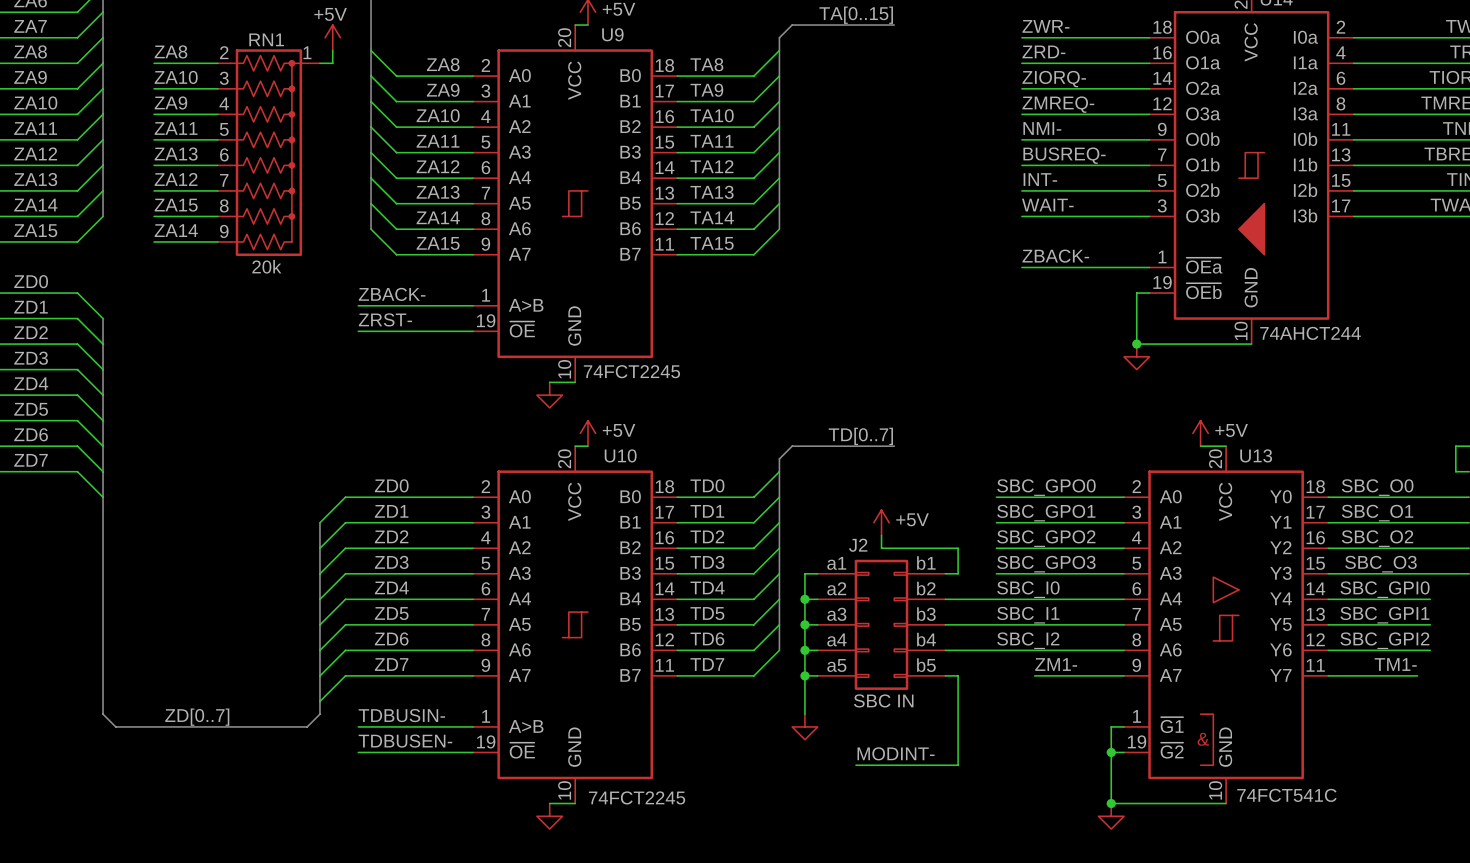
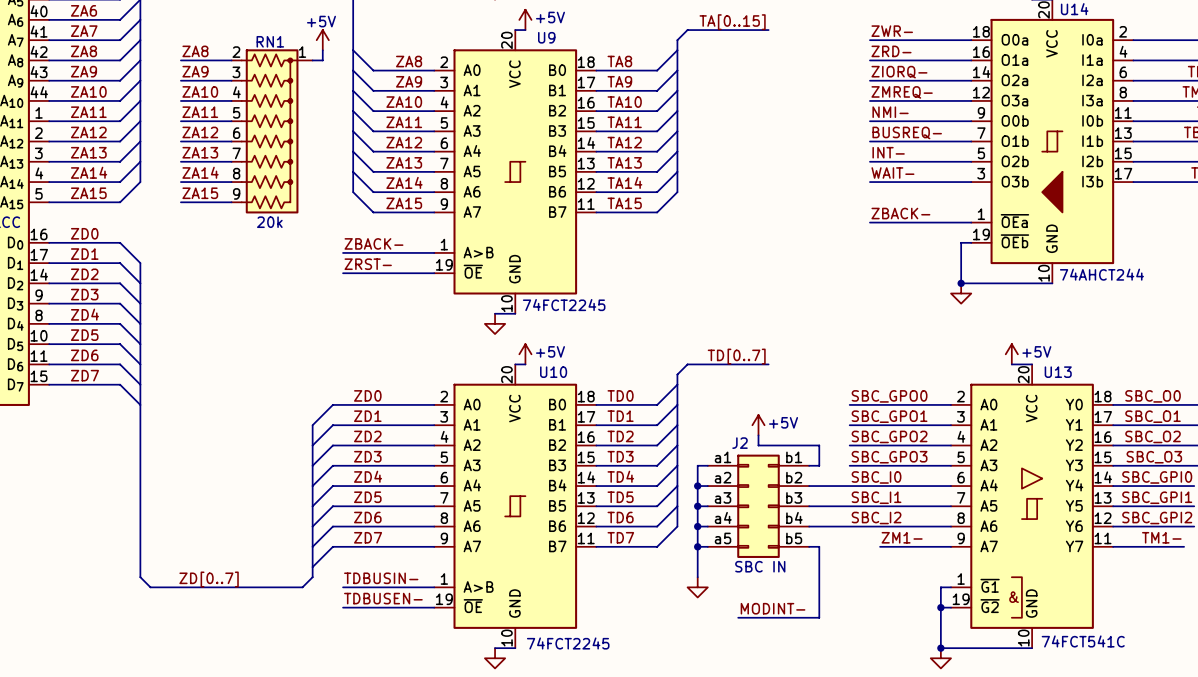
label: ZA10 (176, 77) -> ZA9 (195, 71)
label: ZA9 (170, 102) -> ZA10 (200, 91)
label: ZA13 (176, 154) -> ZA12 (200, 132)
label: ZA12 (176, 179) -> ZA13 (200, 152)
label: ZA15 (176, 205) -> ZA14 (200, 172)
label: ZA14 (176, 230) -> ZA15 (200, 193)

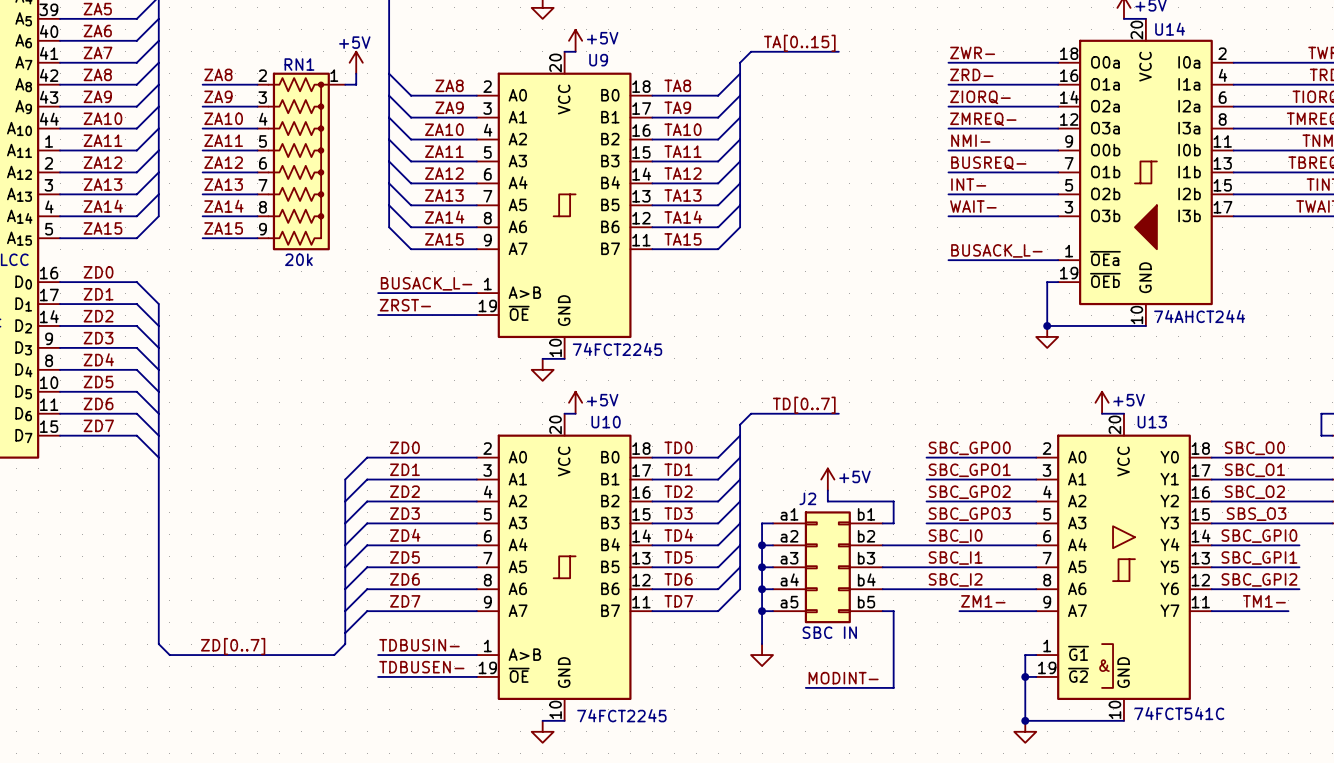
label: ZBACK- (900, 213) -> BUSACK_L- (996, 250)
label: ZBACK- (374, 243) -> BUSACK_L- (426, 283)
label: SBC_O3 (1154, 457) -> SBS_O3 (1256, 514)

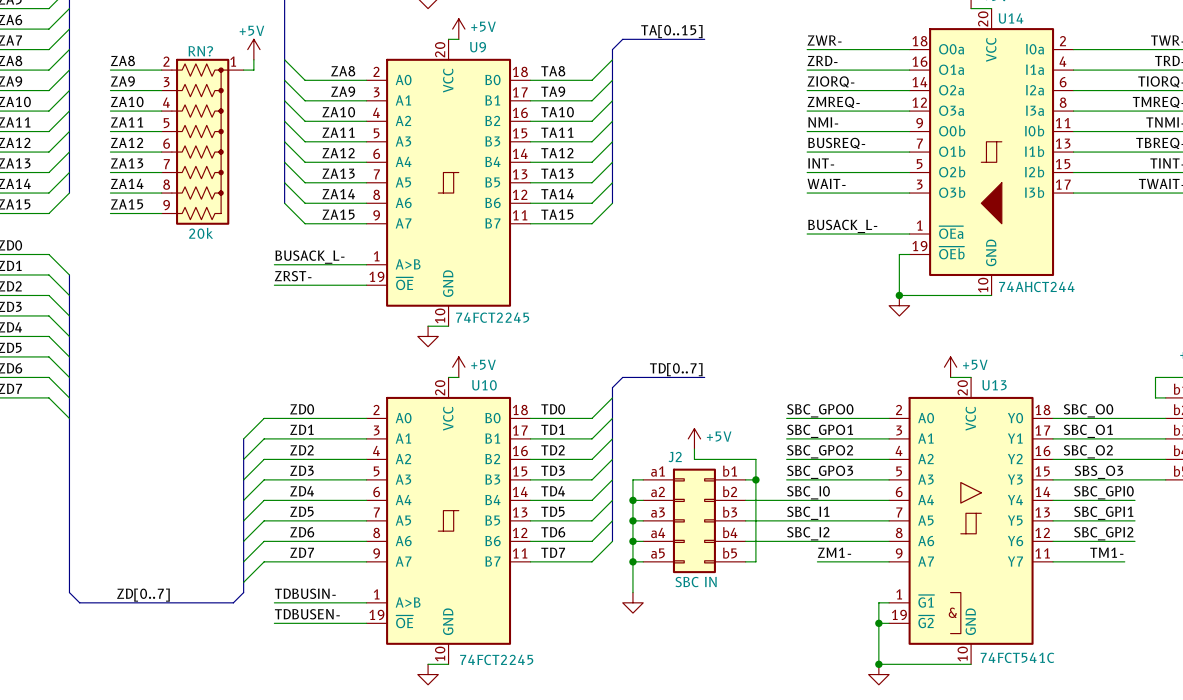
RN1 name: RN1 (299, 64) -> RN? (200, 51)
junction: none -> (755, 479)
wire: (893, 611) (893, 687) (805, 687) -> (755, 561) (755, 479)
label: MODINT- (843, 678) -> none

